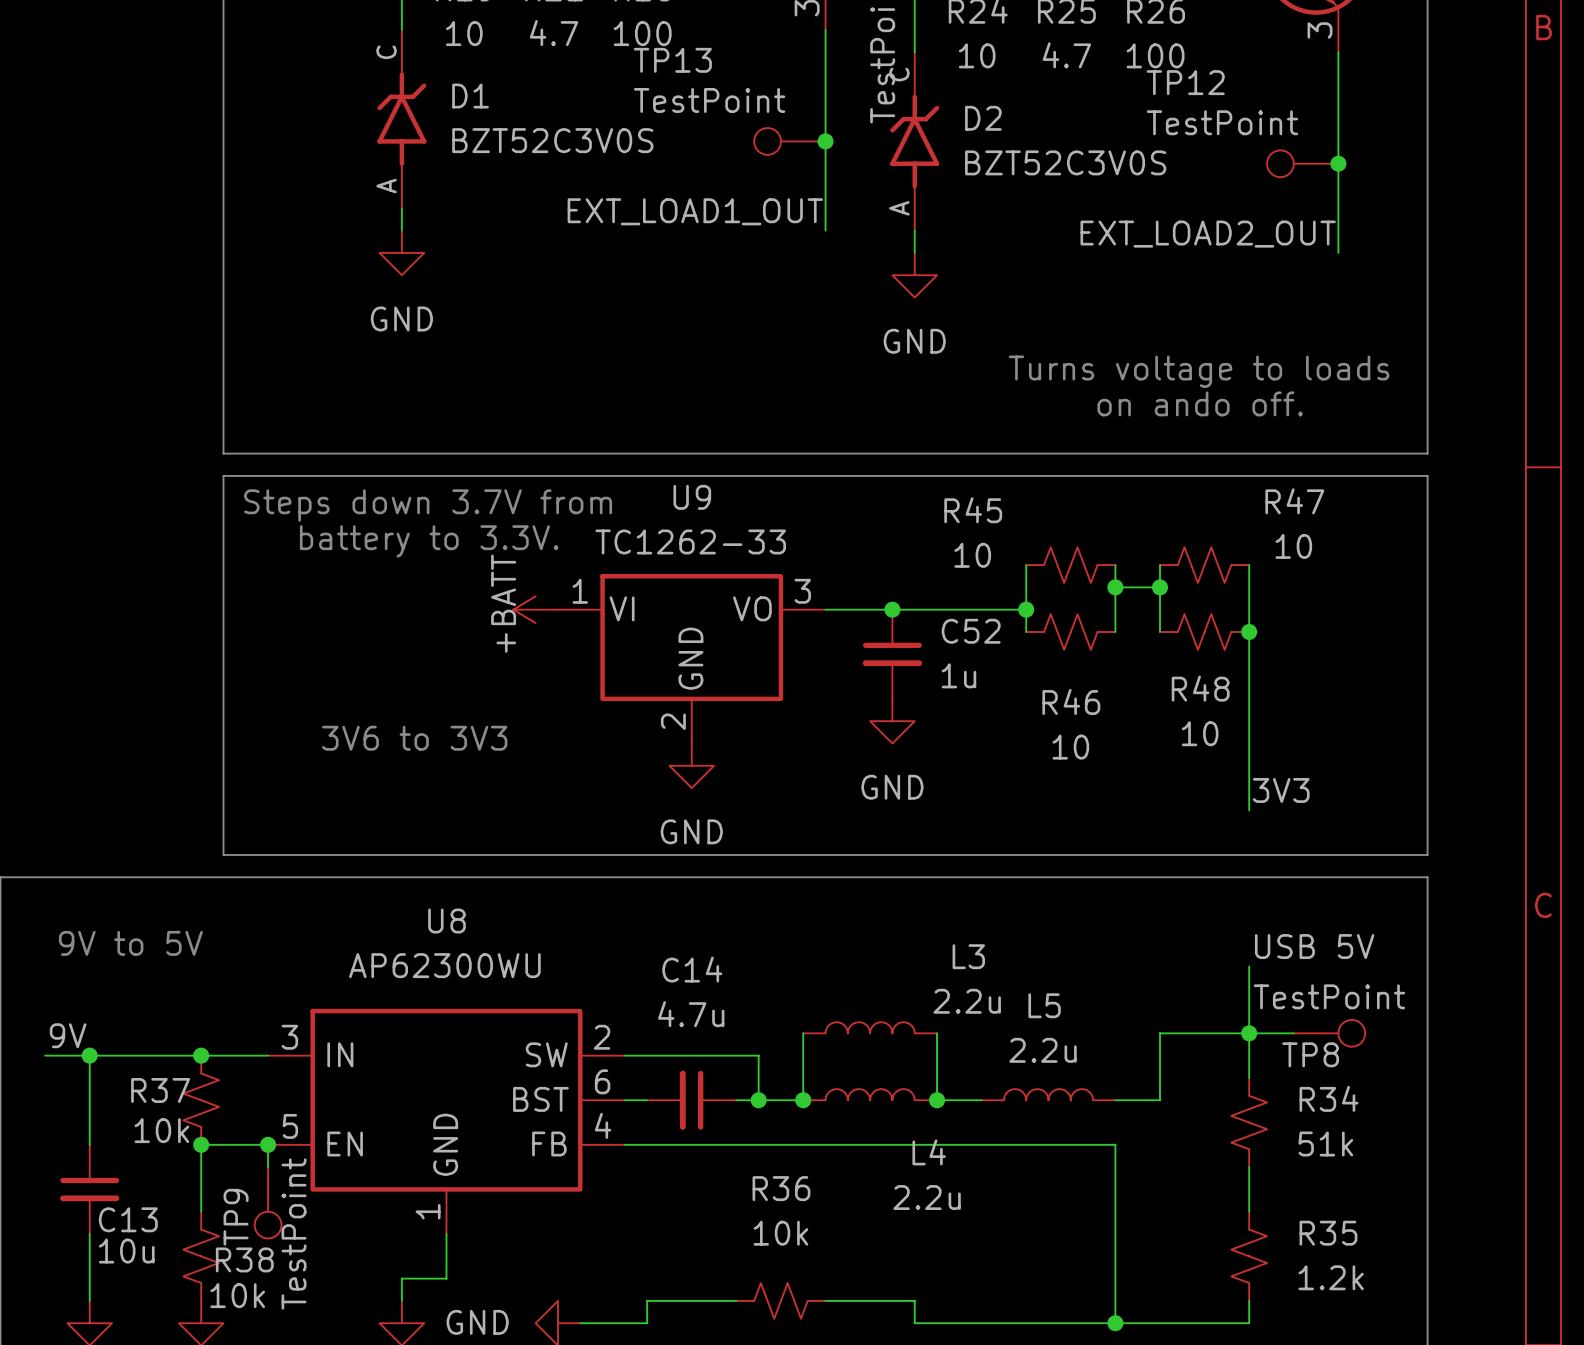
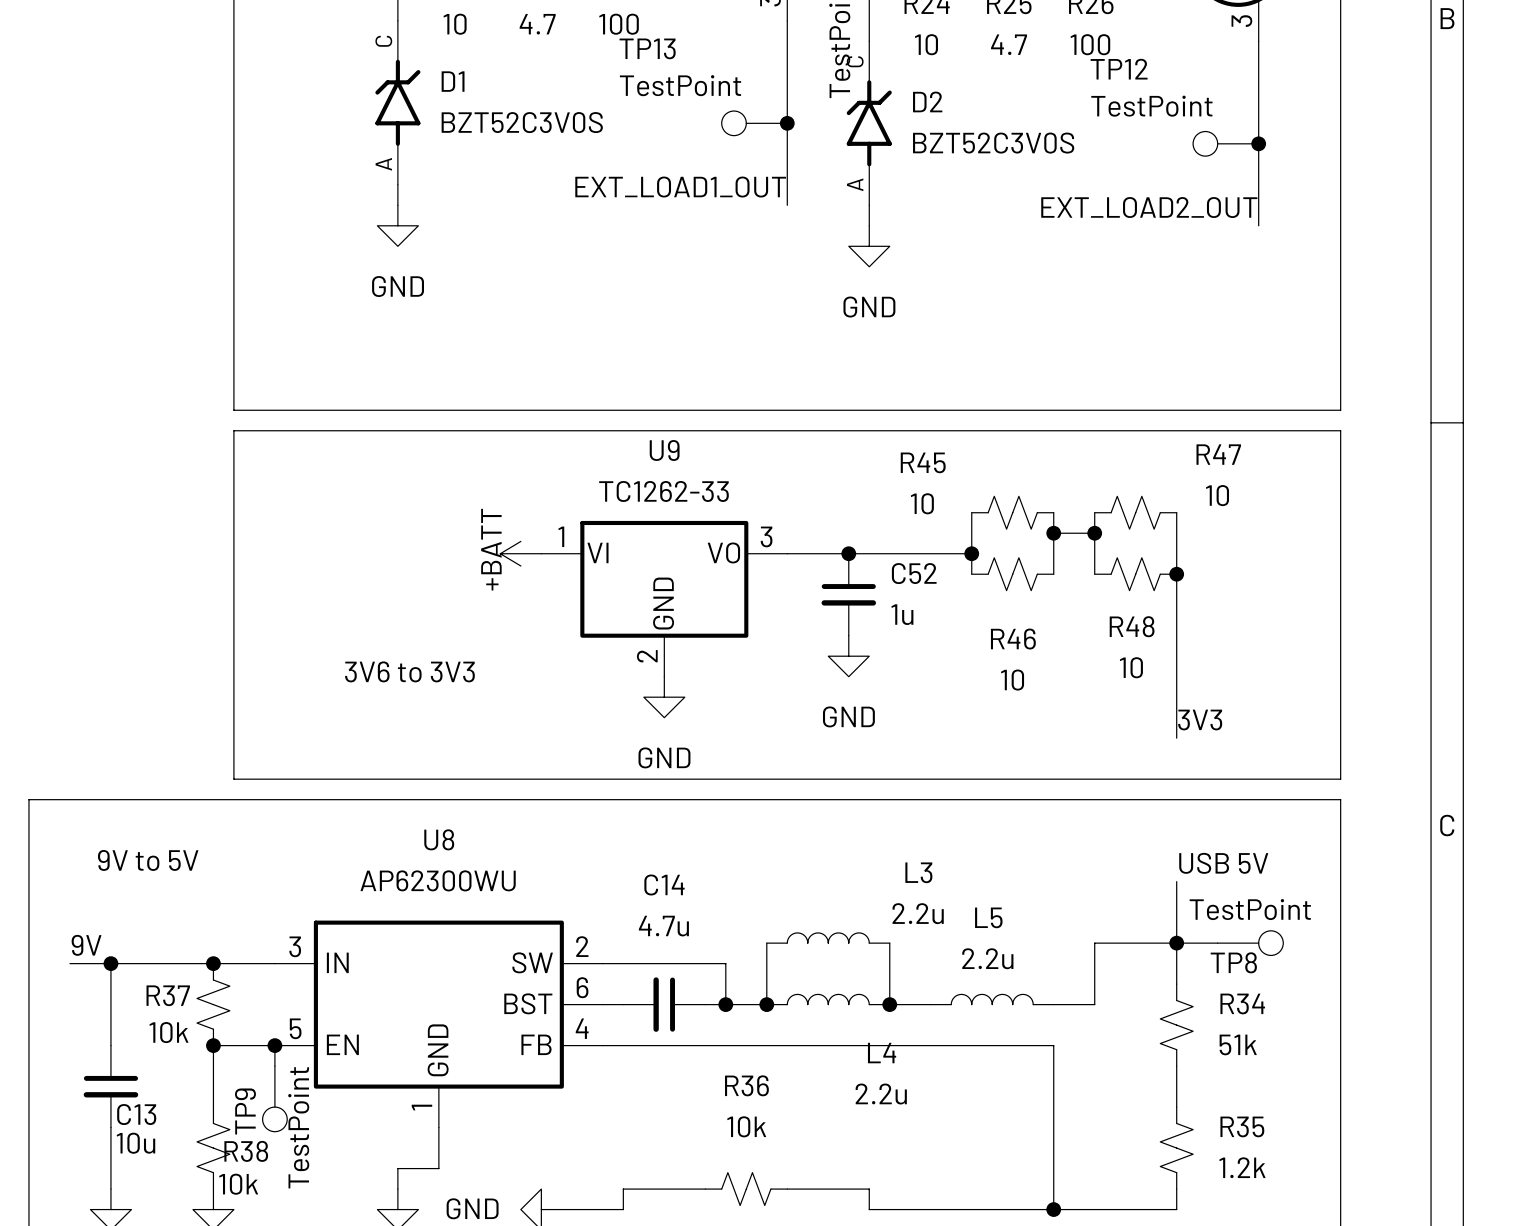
text: Turns voltage to loads (1199, 371) -> none
text: on ando off. (1200, 403) -> none
text: Steps down 3.7V from (428, 505) -> none
text: battery to 3.3V. (429, 541) -> none

